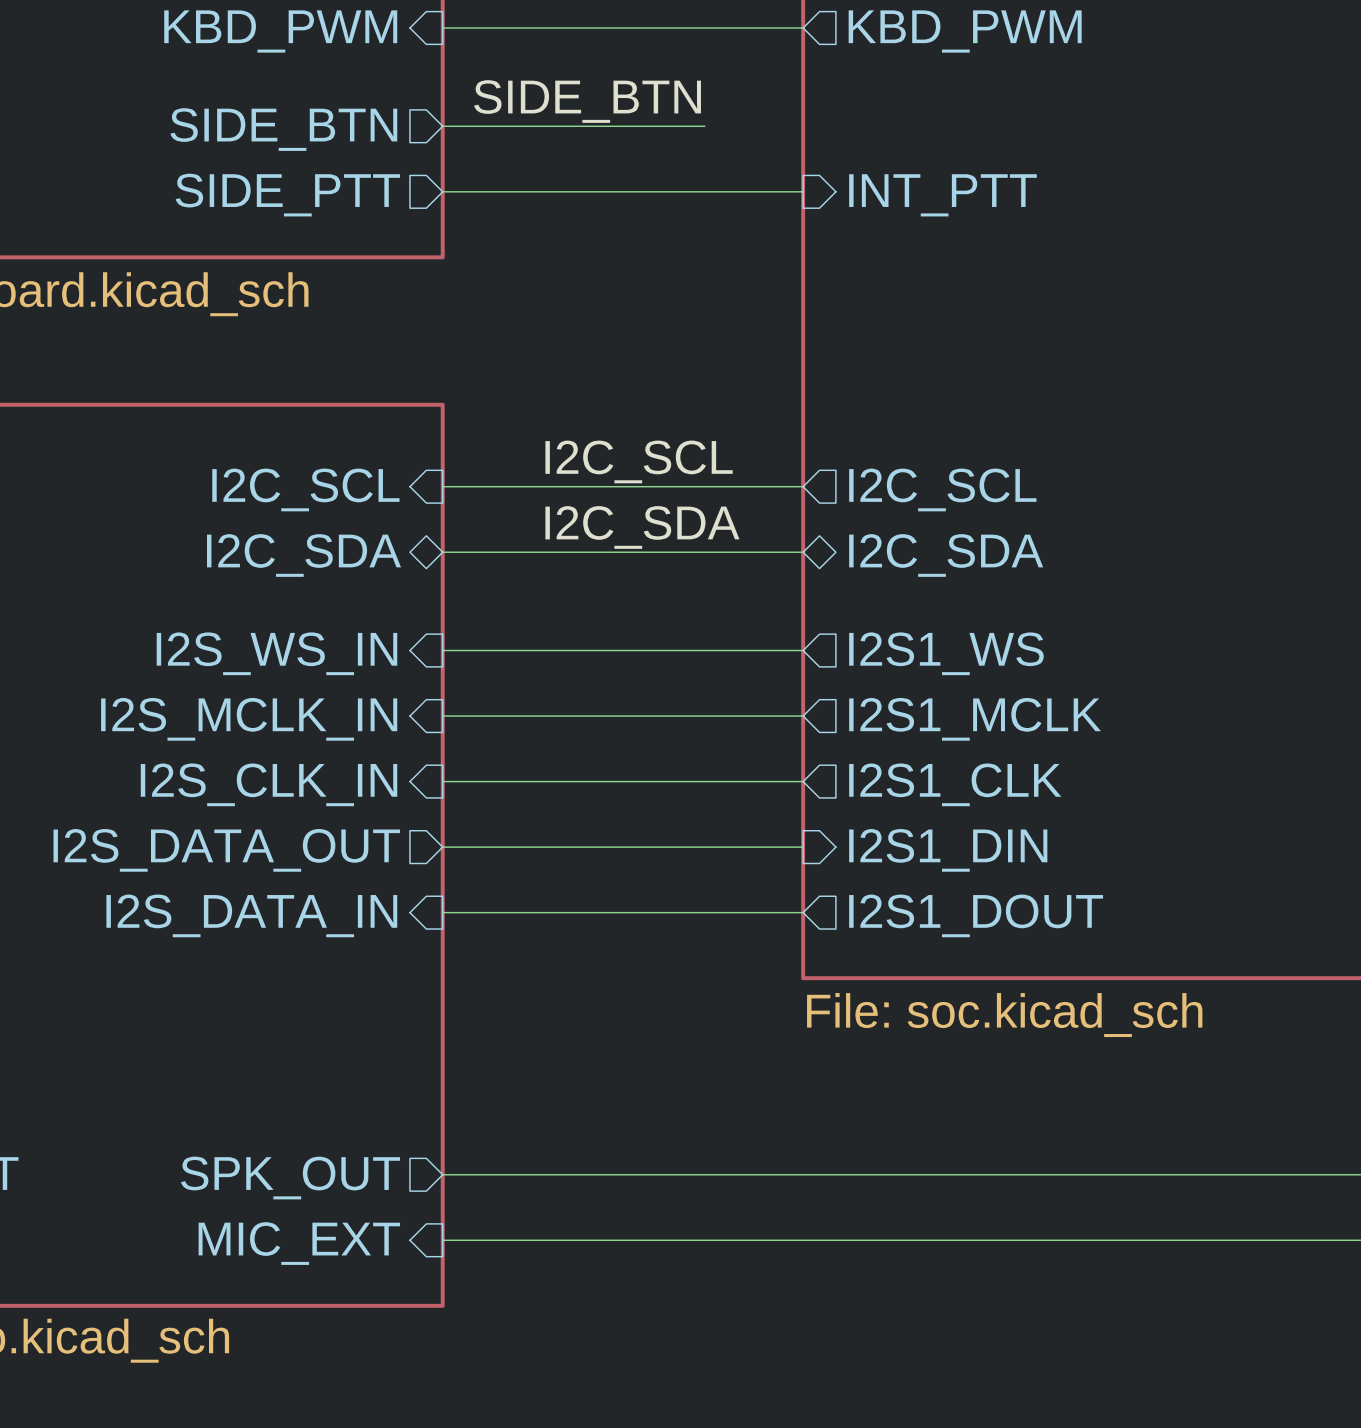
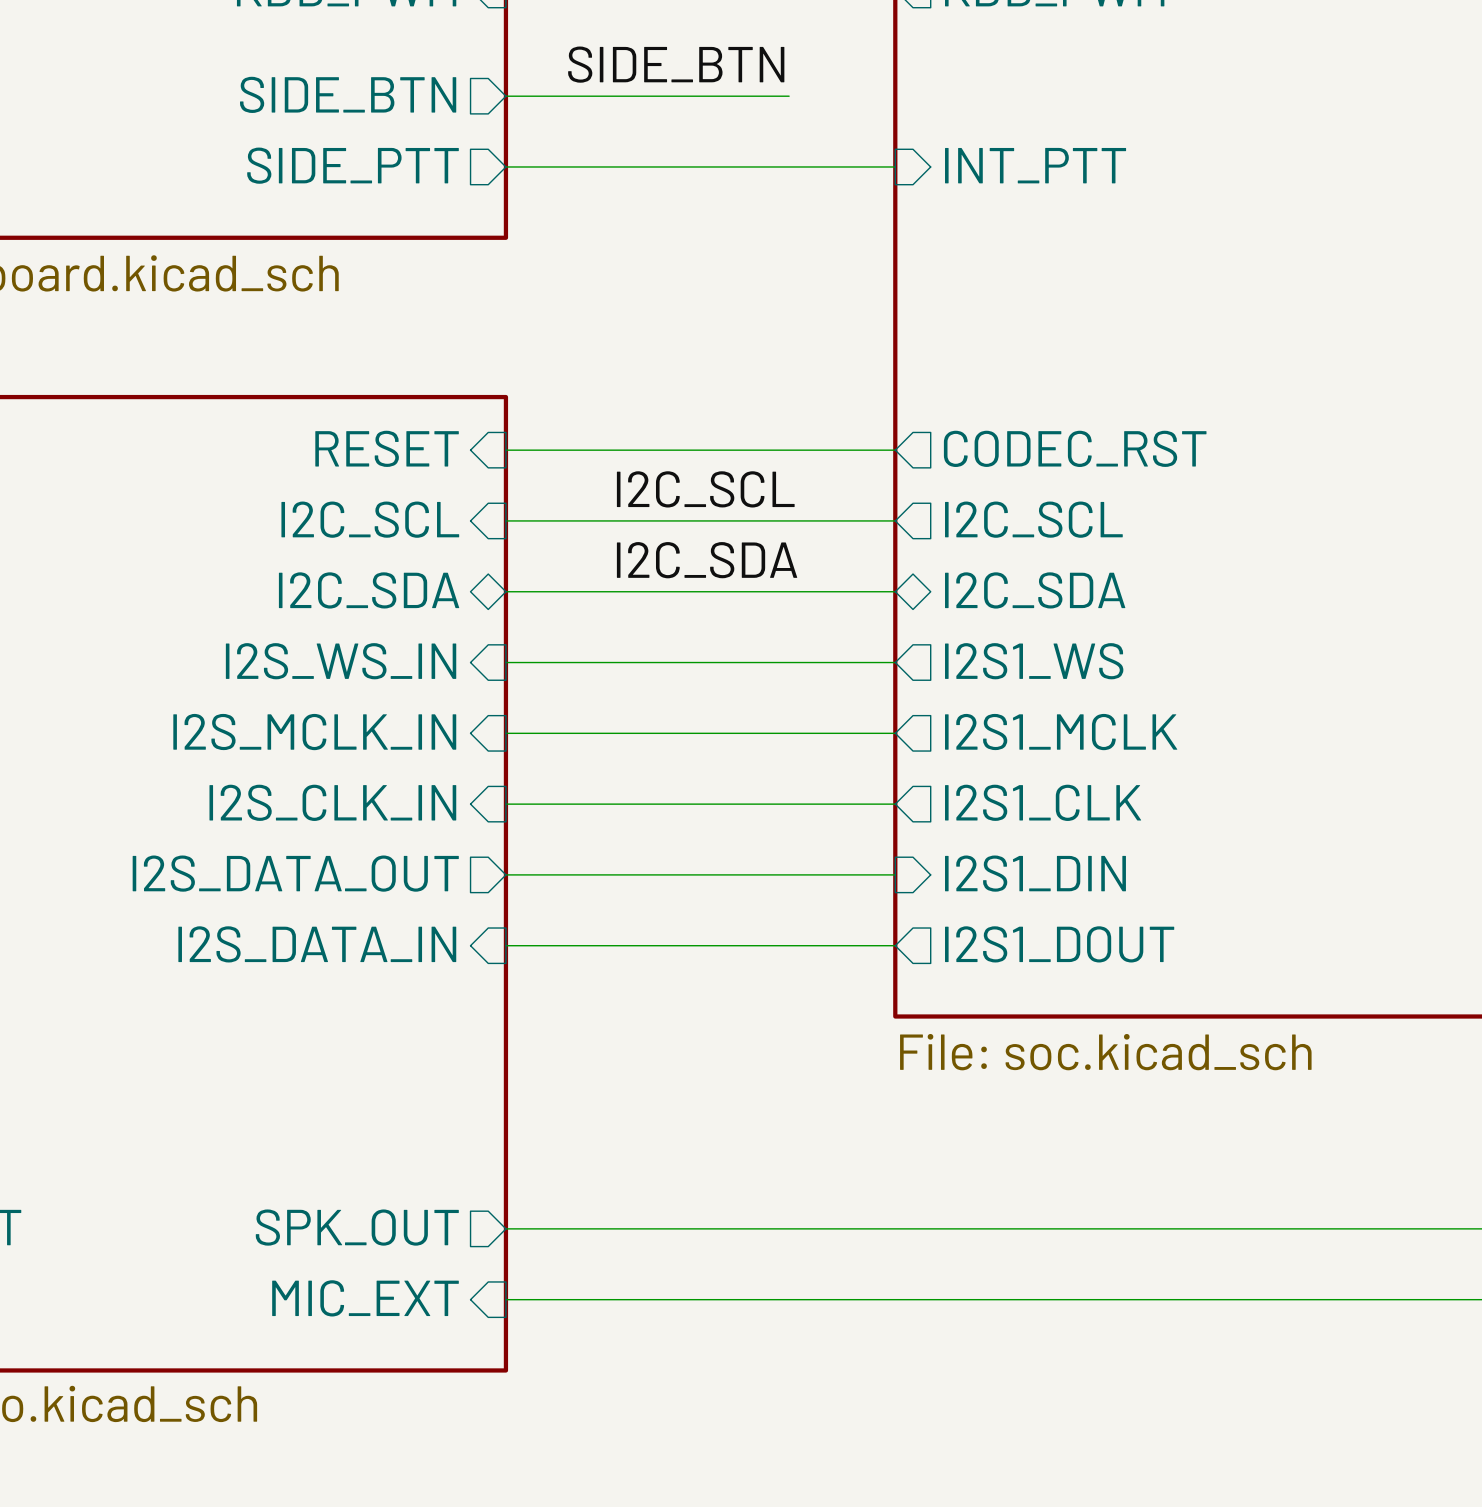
sheet pin: none -> RESET (387, 448)
sheet pin: none -> CODEC_RST (1075, 448)
label position: I2C_SCL (639, 461) -> I2C_SCL (705, 489)
wire: (442, 486) (803, 486) -> (505, 450) (895, 450)
sheet pin position: I2C_SCL (305, 489) -> I2C_SCL (370, 519)
sheet pin position: I2C_SCL (942, 489) -> I2C_SCL (1033, 519)
label position: I2C_SDA (642, 527) -> I2C_SDA (707, 560)
wire: (442, 552) (803, 552) -> (505, 520) (895, 520)
sheet pin position: I2C_SDA (304, 555) -> I2C_SDA (369, 590)
sheet pin position: I2C_SDA (946, 555) -> I2C_SDA (1035, 590)
wire: none -> (505, 591) (895, 591)

